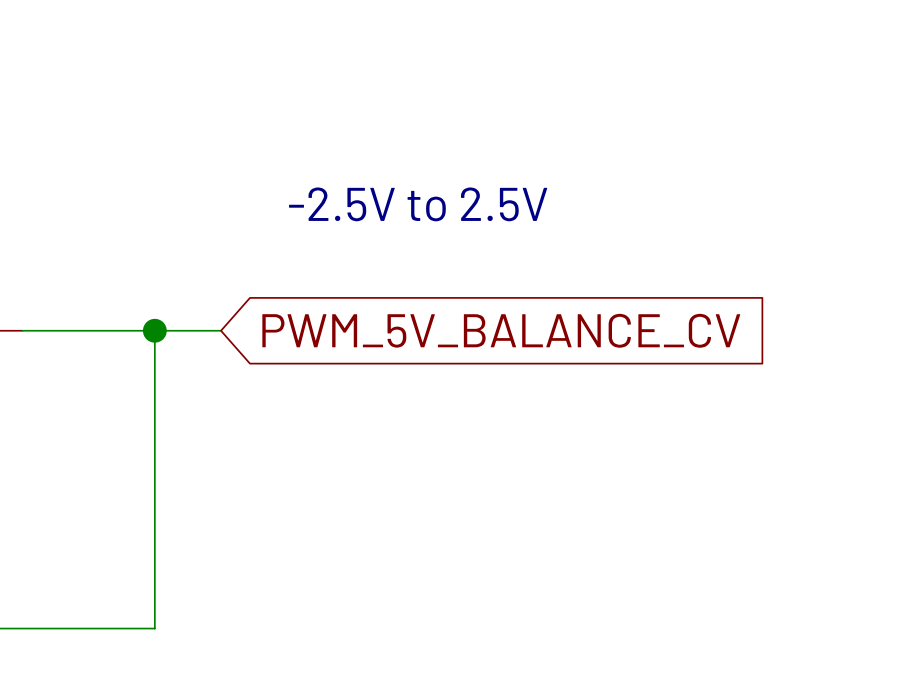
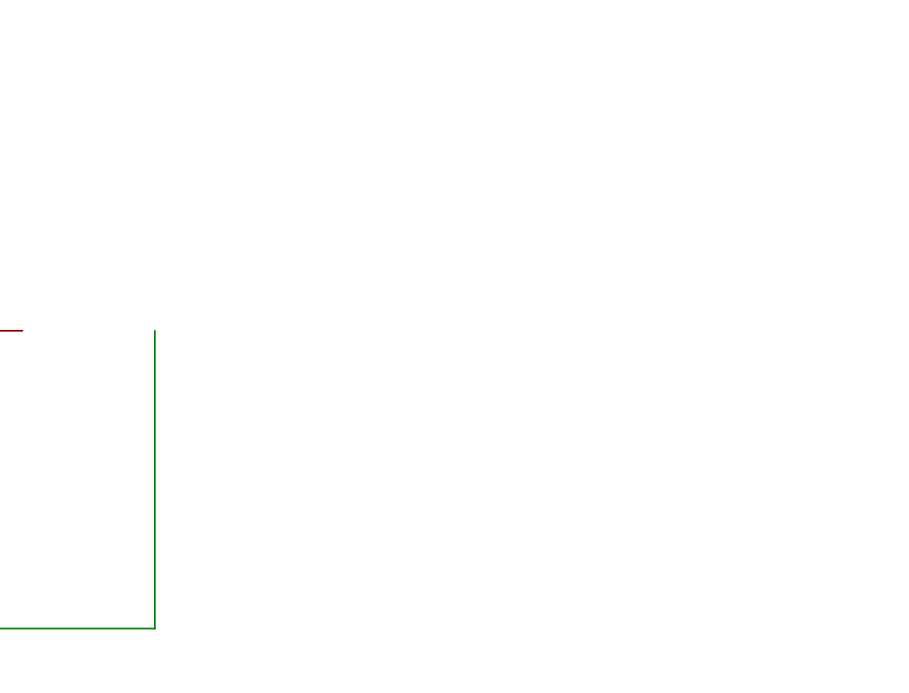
text: -2.5V to 2.5V (418, 204) -> none
wire: (22, 330) (221, 330) -> none
junction: (154, 330) -> none
global label: PWM_5V_BALANCE_CV (501, 330) -> none

